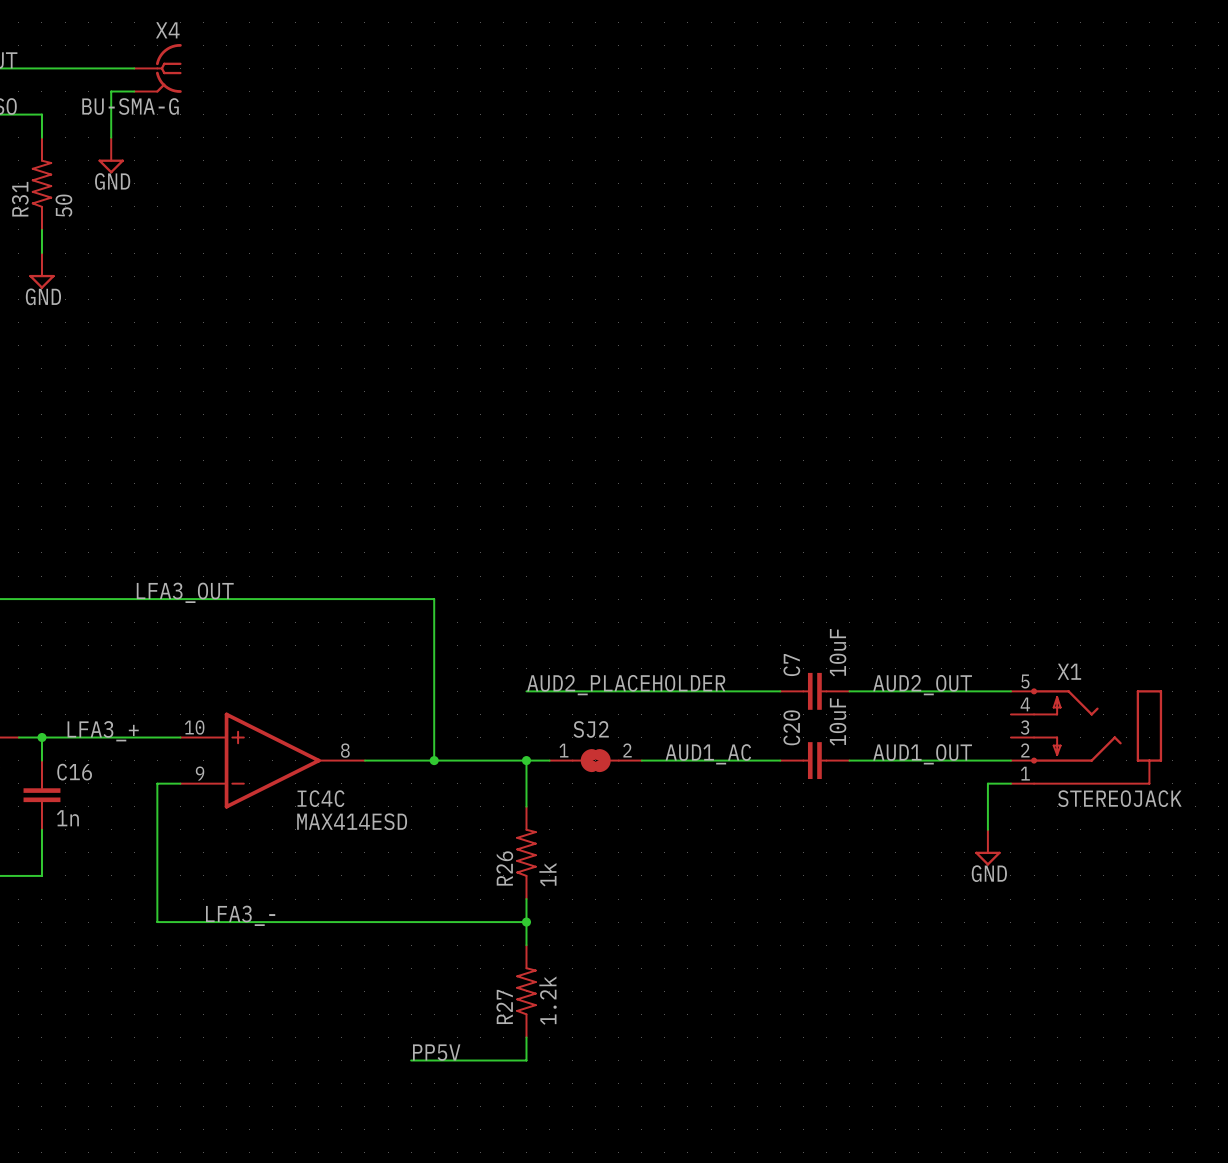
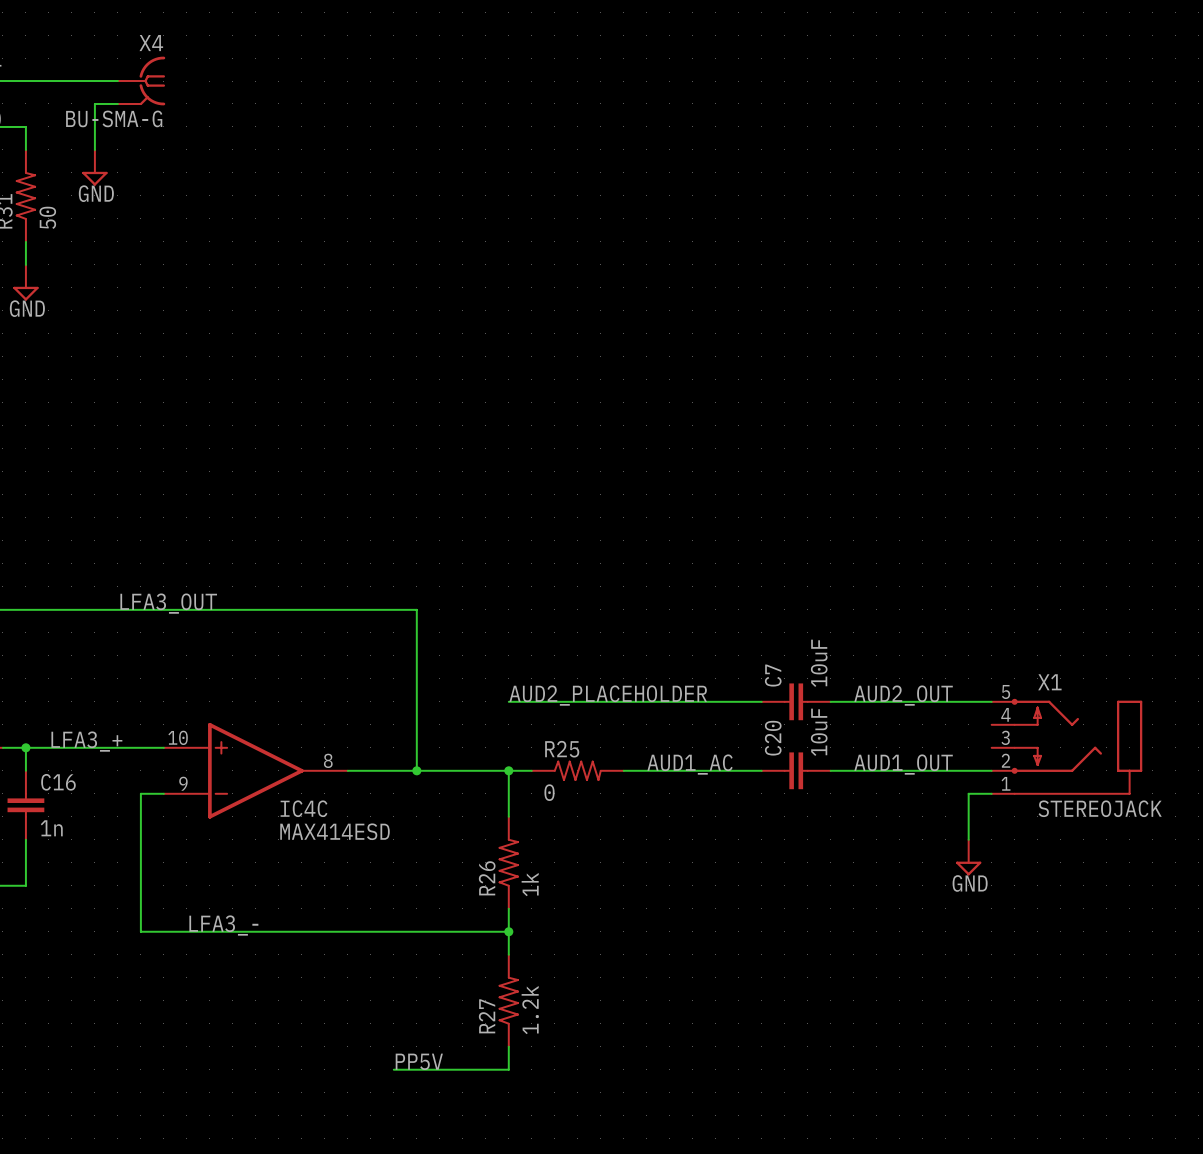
SJ2: (595, 760) -> none
R25: none -> 0 (577, 770)

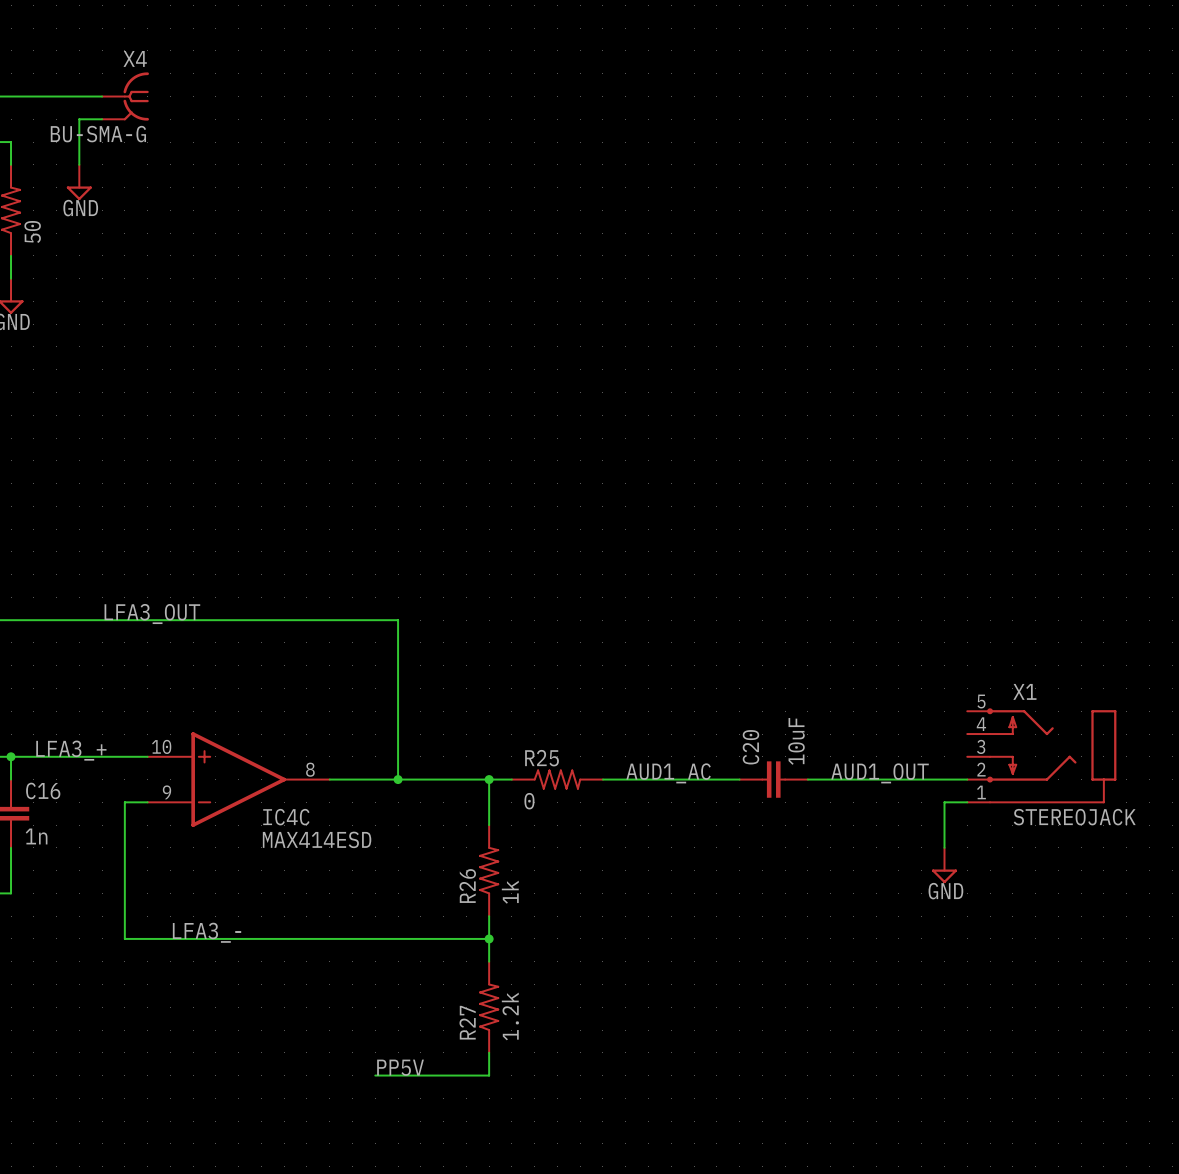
label: AUD2_PLACEHOLDER (608, 695) -> none
label: AUD2_OUT (903, 695) -> none
wire: (508, 701) (761, 701) -> none
C7: 10uF (796, 701) -> none
wire: (830, 701) (991, 701) -> none

